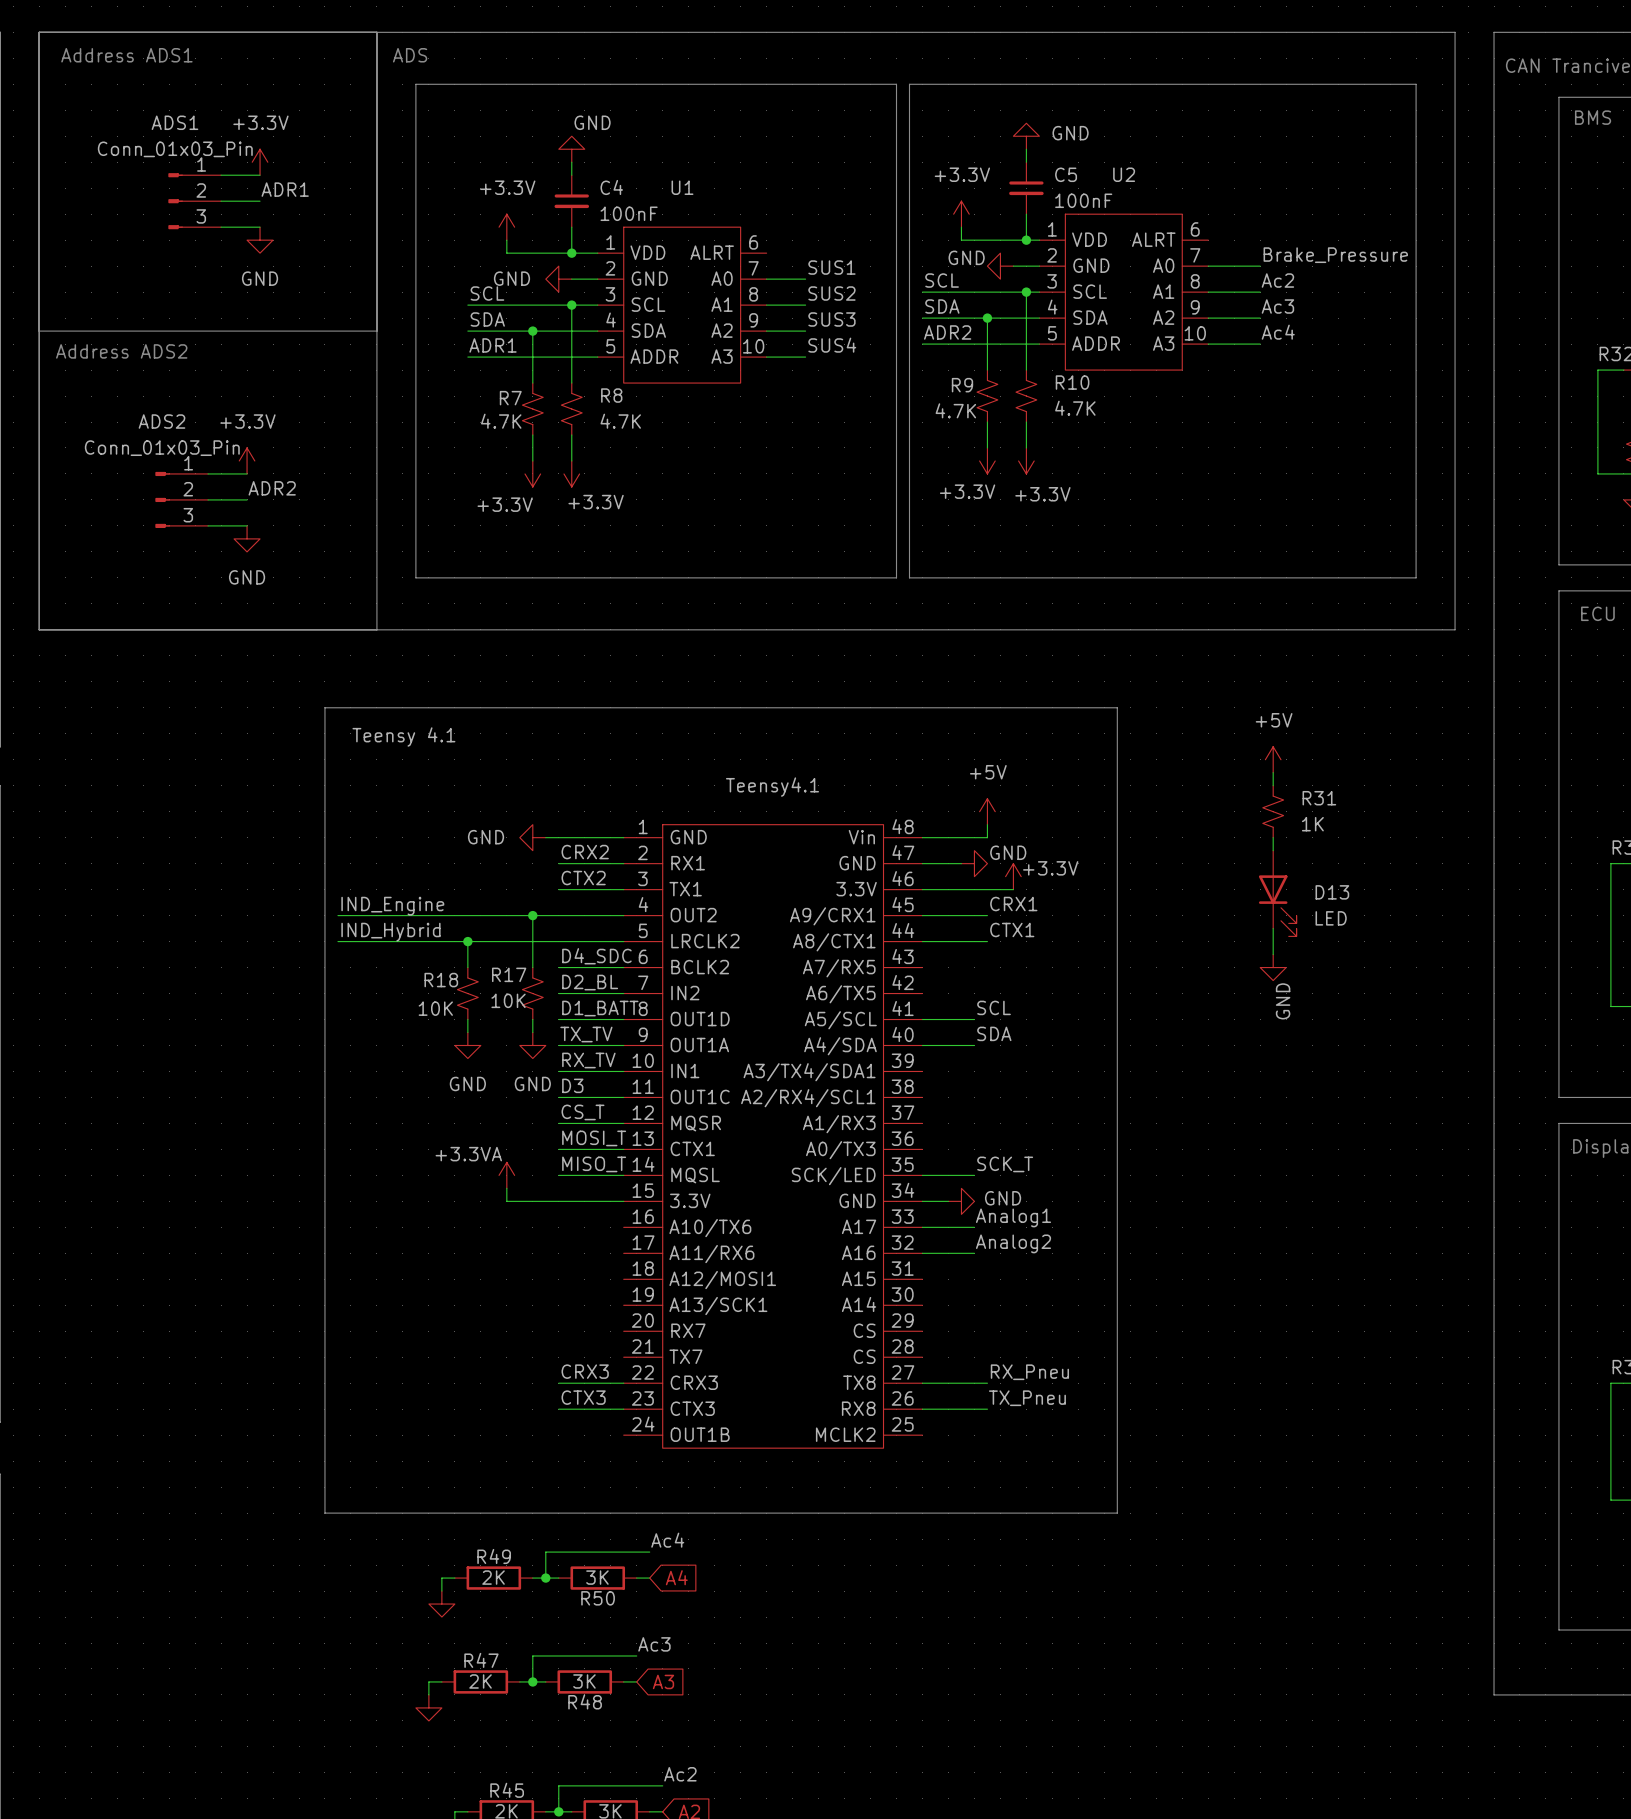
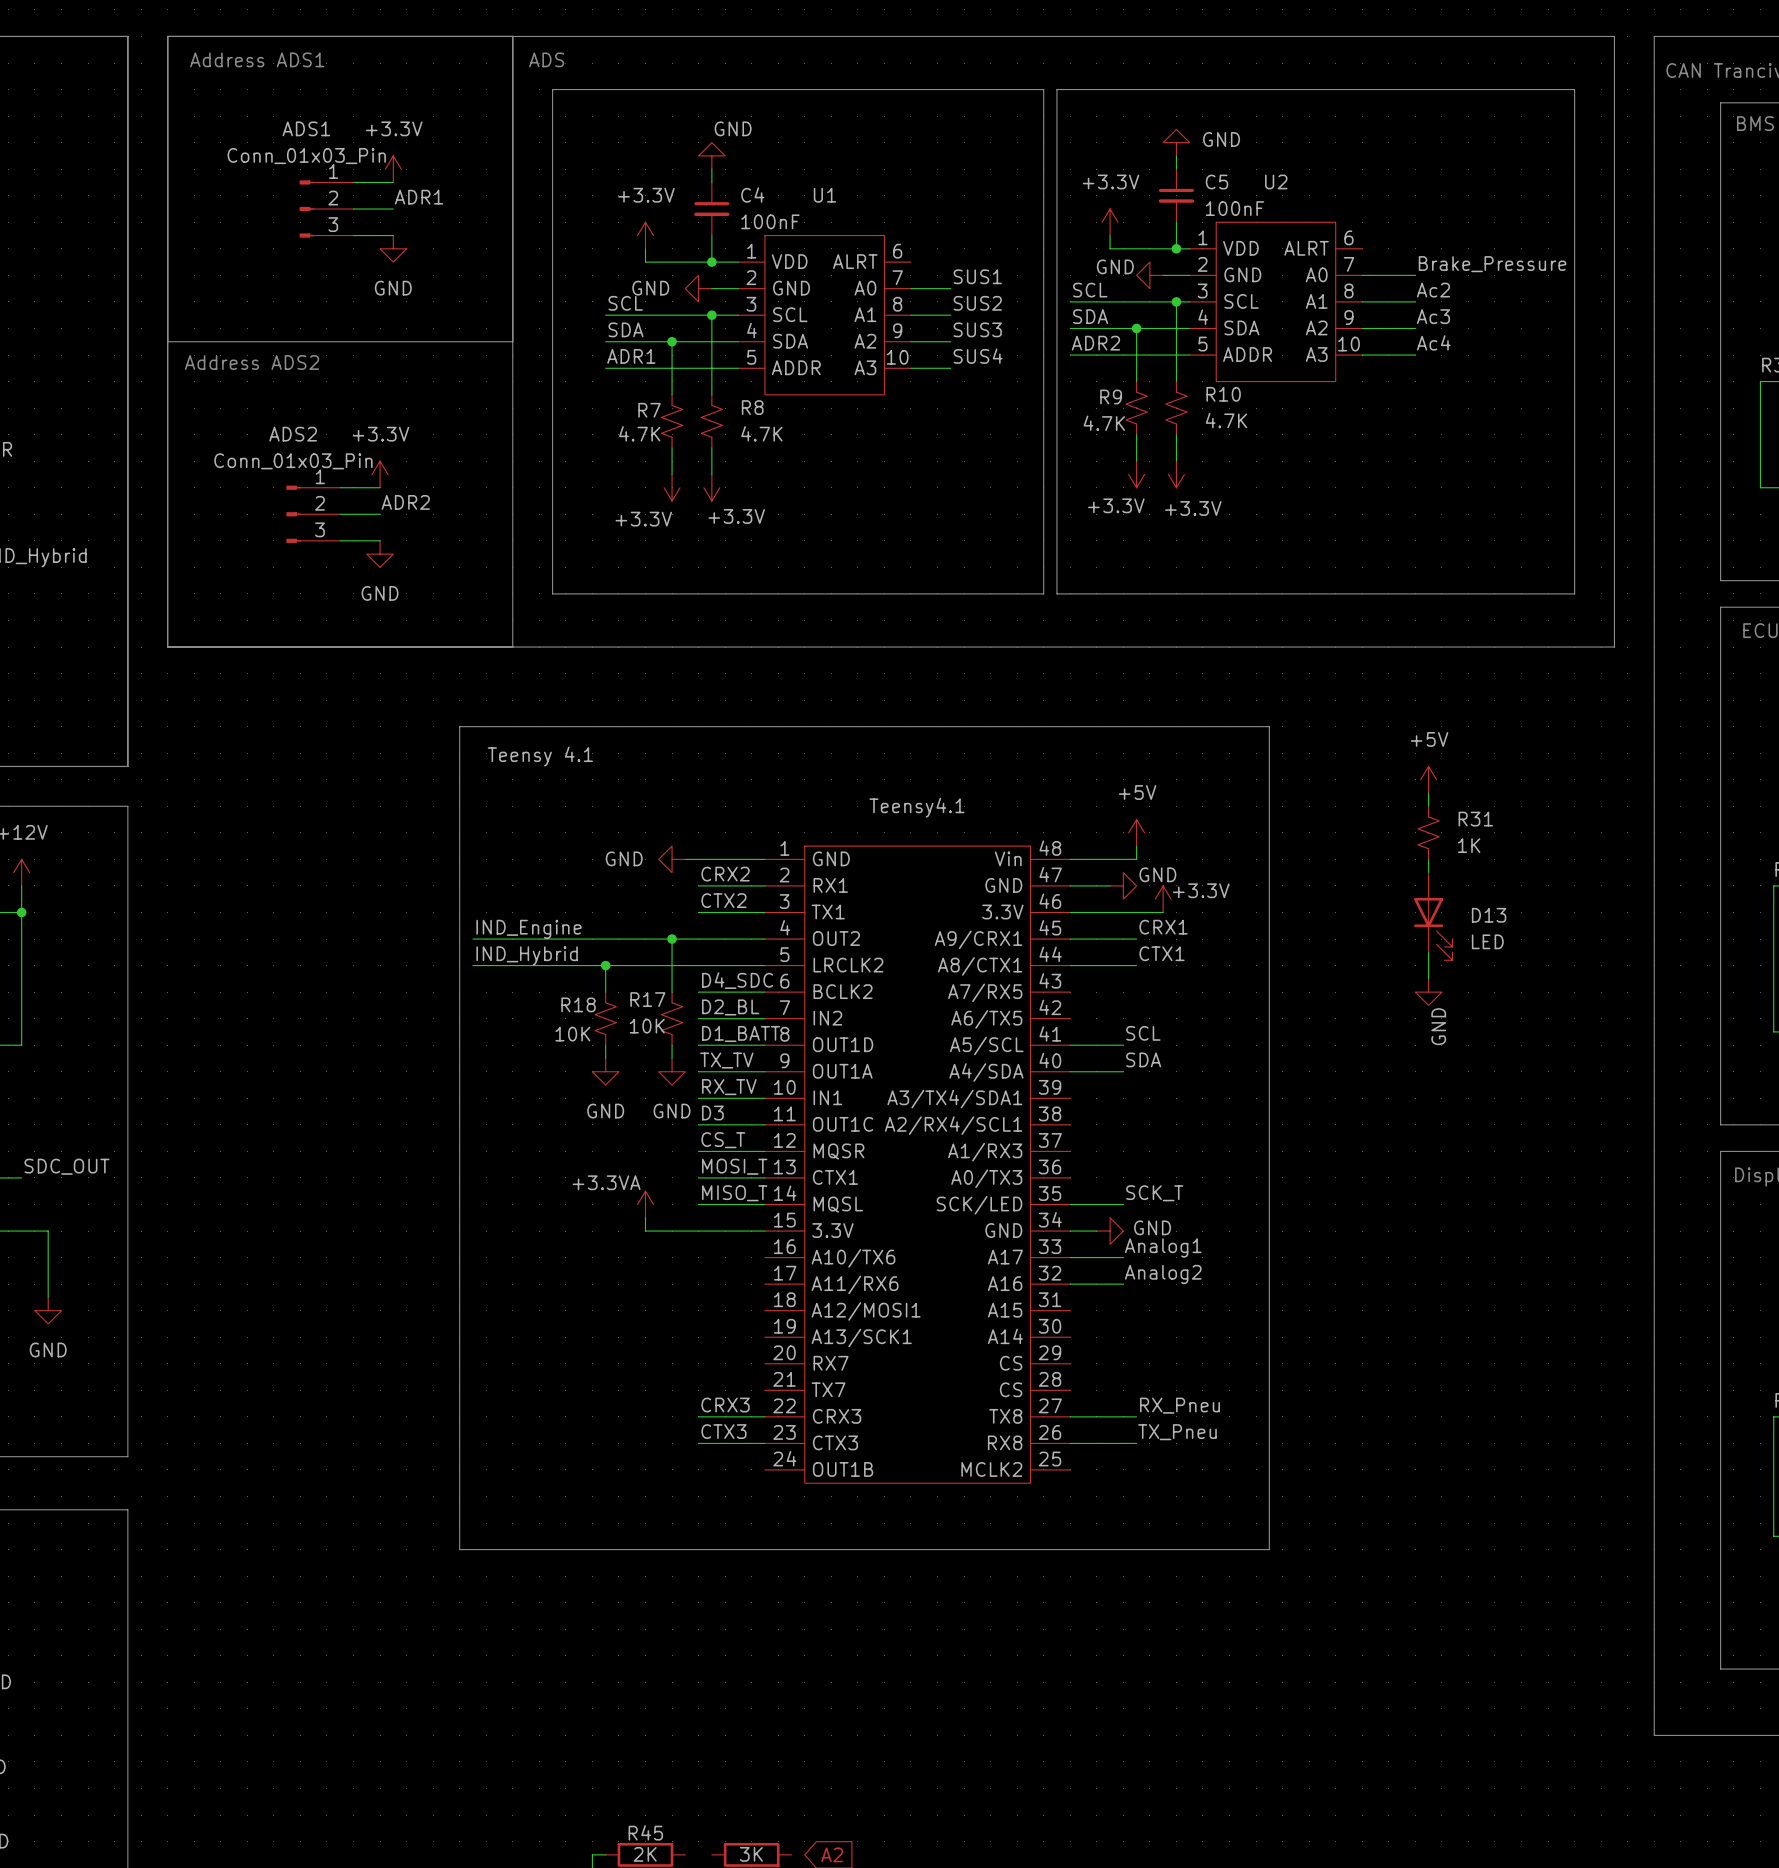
label: Ac4 (667, 1540) -> none
wire: (649, 1552) (545, 1552) (545, 1578) -> none
global label: A4 (676, 1577) -> none
wire: (454, 1578) (441, 1578) (441, 1591) -> none
R49: 2K (493, 1578) -> none
wire: (532, 1578) (558, 1578) -> none
junction: (545, 1578) -> none
R50: 3K (597, 1578) -> none
wire: (636, 1578) (649, 1578) -> none
power symbol: (441, 1604) -> none
label: Ac3 (654, 1644) -> none
wire: (636, 1655) (532, 1655) (532, 1681) -> none
wire: (441, 1681) (428, 1681) (428, 1694) -> none
R47: 2K (480, 1681) -> none
wire: (519, 1681) (545, 1681) -> none
junction: (532, 1681) -> none
R48: 3K (584, 1681) -> none
wire: (623, 1681) (636, 1681) -> none
global label: A3 (663, 1681) -> none
power symbol: (428, 1707) -> none
label: Ac2 (680, 1774) -> none
wire: (662, 1785) (558, 1785) (558, 1811) -> none
wire: (545, 1811) (571, 1811) -> none
junction: (558, 1811) -> none
wire: (649, 1811) (662, 1811) -> none

